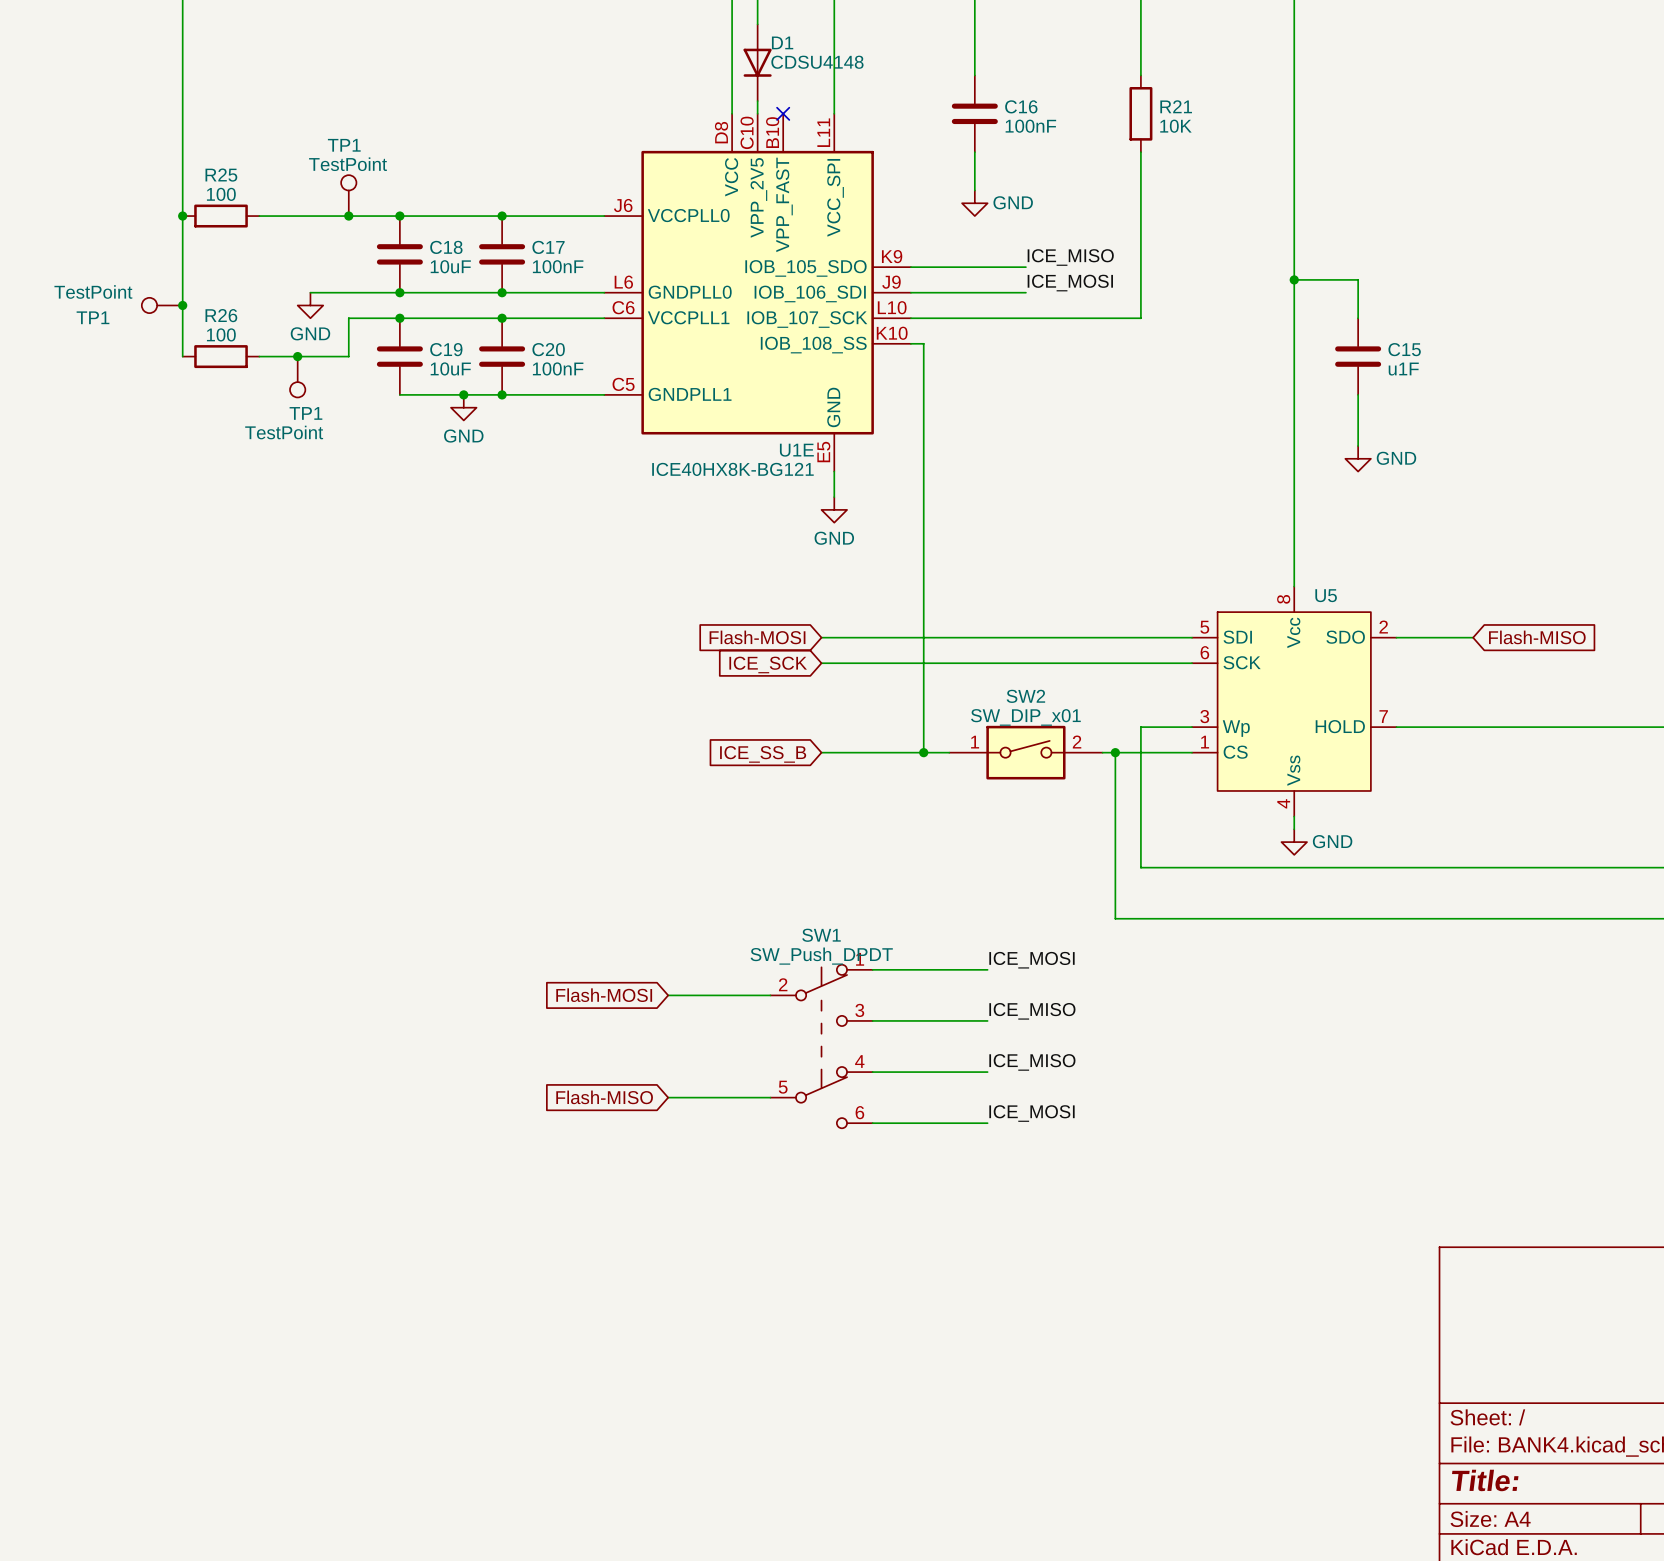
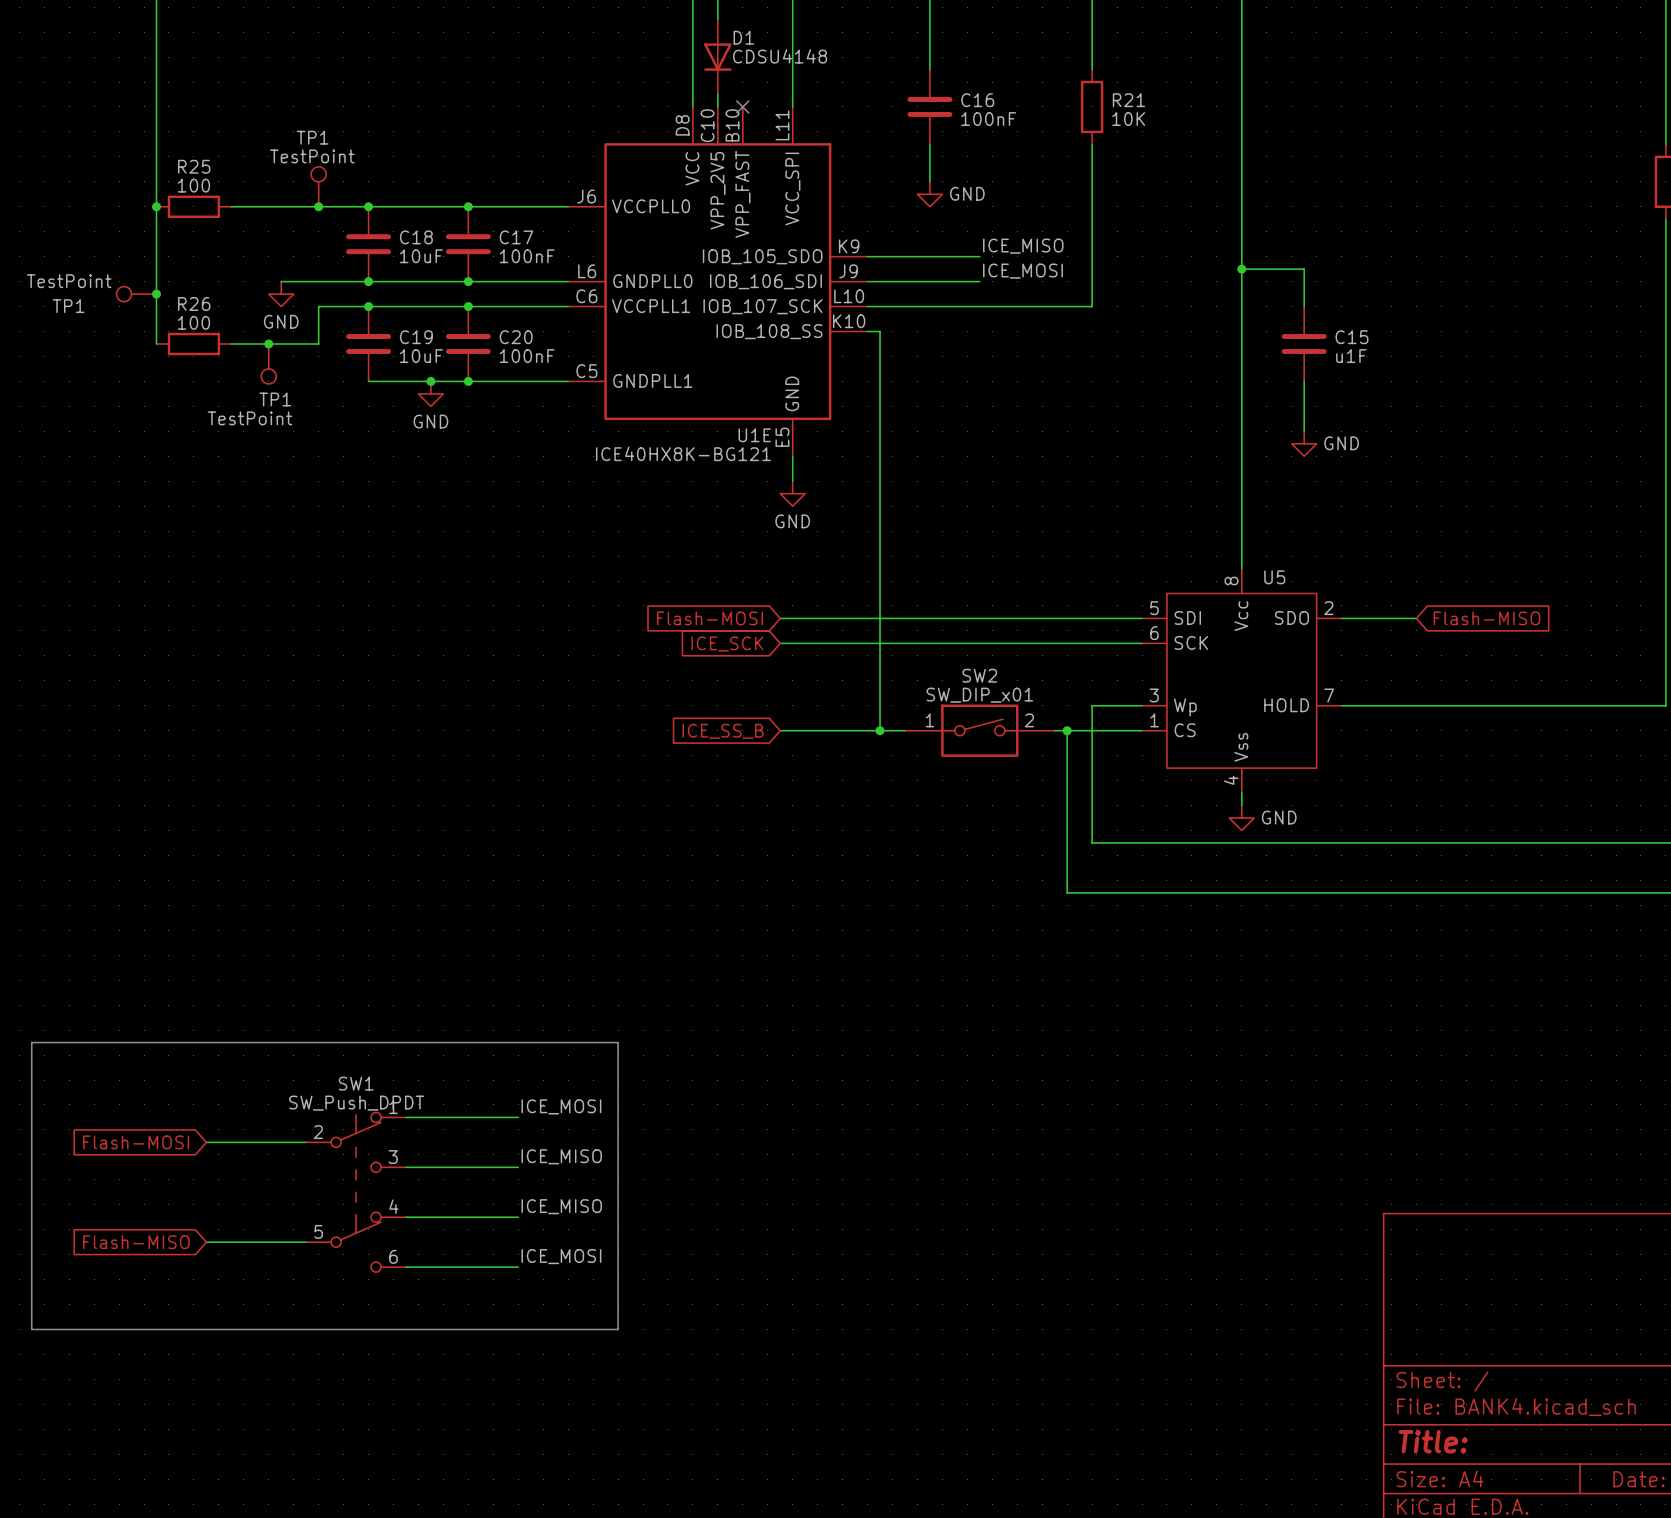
label: ICE_MOSI (1031, 960) -> none
wire: (872, 969) (987, 969) -> none
global label: Flash-MOSI (604, 995) -> none
wire: (668, 995) (770, 995) -> none
label: ICE_MISO (1032, 1011) -> none
wire: (872, 1020) (987, 1020) -> none
SW1 position: (821, 1046) -> (356, 1192)
label: ICE_MISO (1032, 1062) -> none
line: none -> (31, 1042) (618, 1042) (618, 1329) (31, 1329) (31, 1042)
wire: (872, 1072) (987, 1072) -> none
global label: Flash-MISO (604, 1097) -> none
wire: (668, 1097) (770, 1097) -> none
label: ICE_MOSI (1031, 1113) -> none
wire: (872, 1123) (987, 1123) -> none
label: none -> ICE_MOSI (561, 1106)
wire: none -> (405, 1117) (518, 1117)
global label: none -> Flash-MOSI (136, 1142)
wire: none -> (206, 1142) (306, 1142)
label: none -> ICE_MISO (561, 1156)
wire: none -> (405, 1167) (518, 1167)
label: none -> ICE_MISO (561, 1206)
wire: none -> (405, 1217) (518, 1217)
global label: none -> Flash-MISO (136, 1242)
wire: none -> (206, 1242) (306, 1242)
label: none -> ICE_MOSI (561, 1256)
wire: none -> (405, 1267) (518, 1267)

